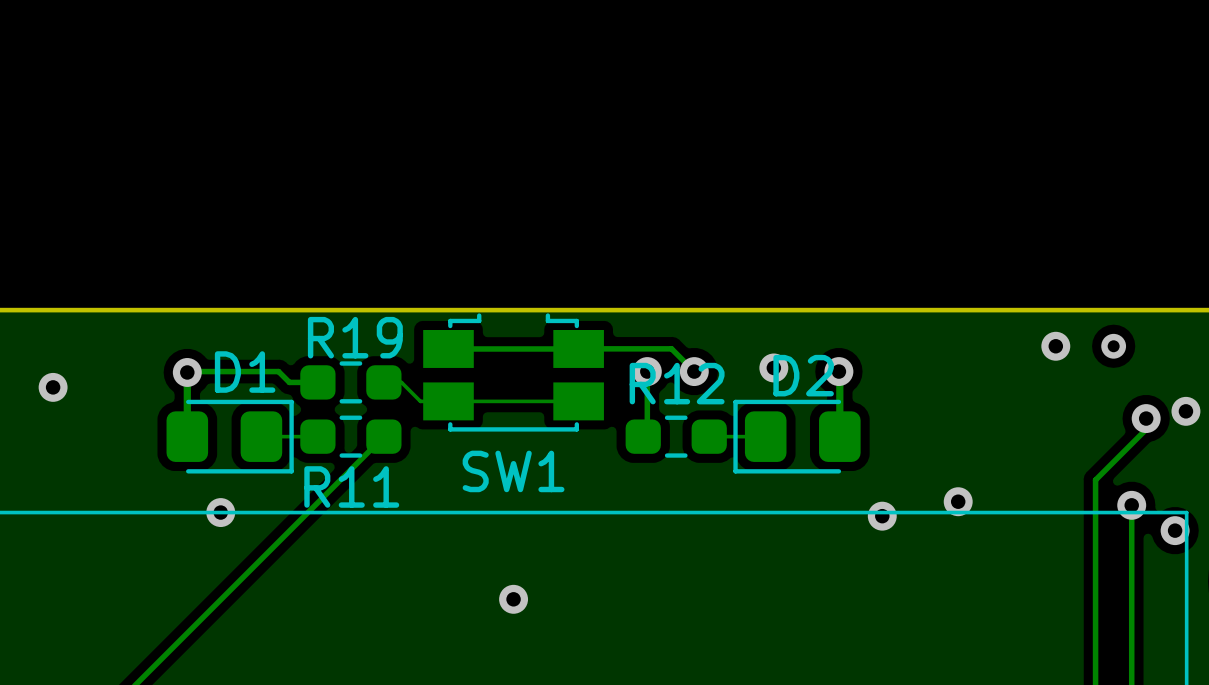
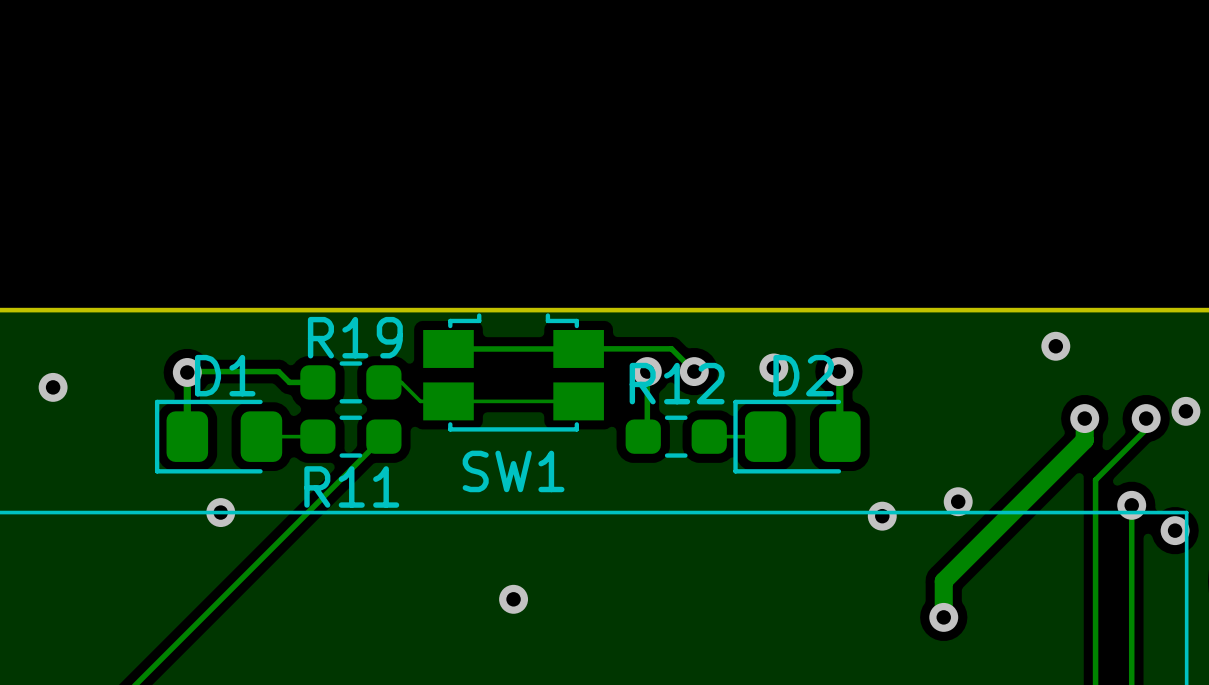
via: (1113, 346) -> none
track: none -> (1084, 418) (1084, 440) (943, 581) (943, 617)
via: none -> (1084, 418)
D1 rotation: 0° (230, 436) -> 180° (218, 436)
via: none -> (943, 617)

